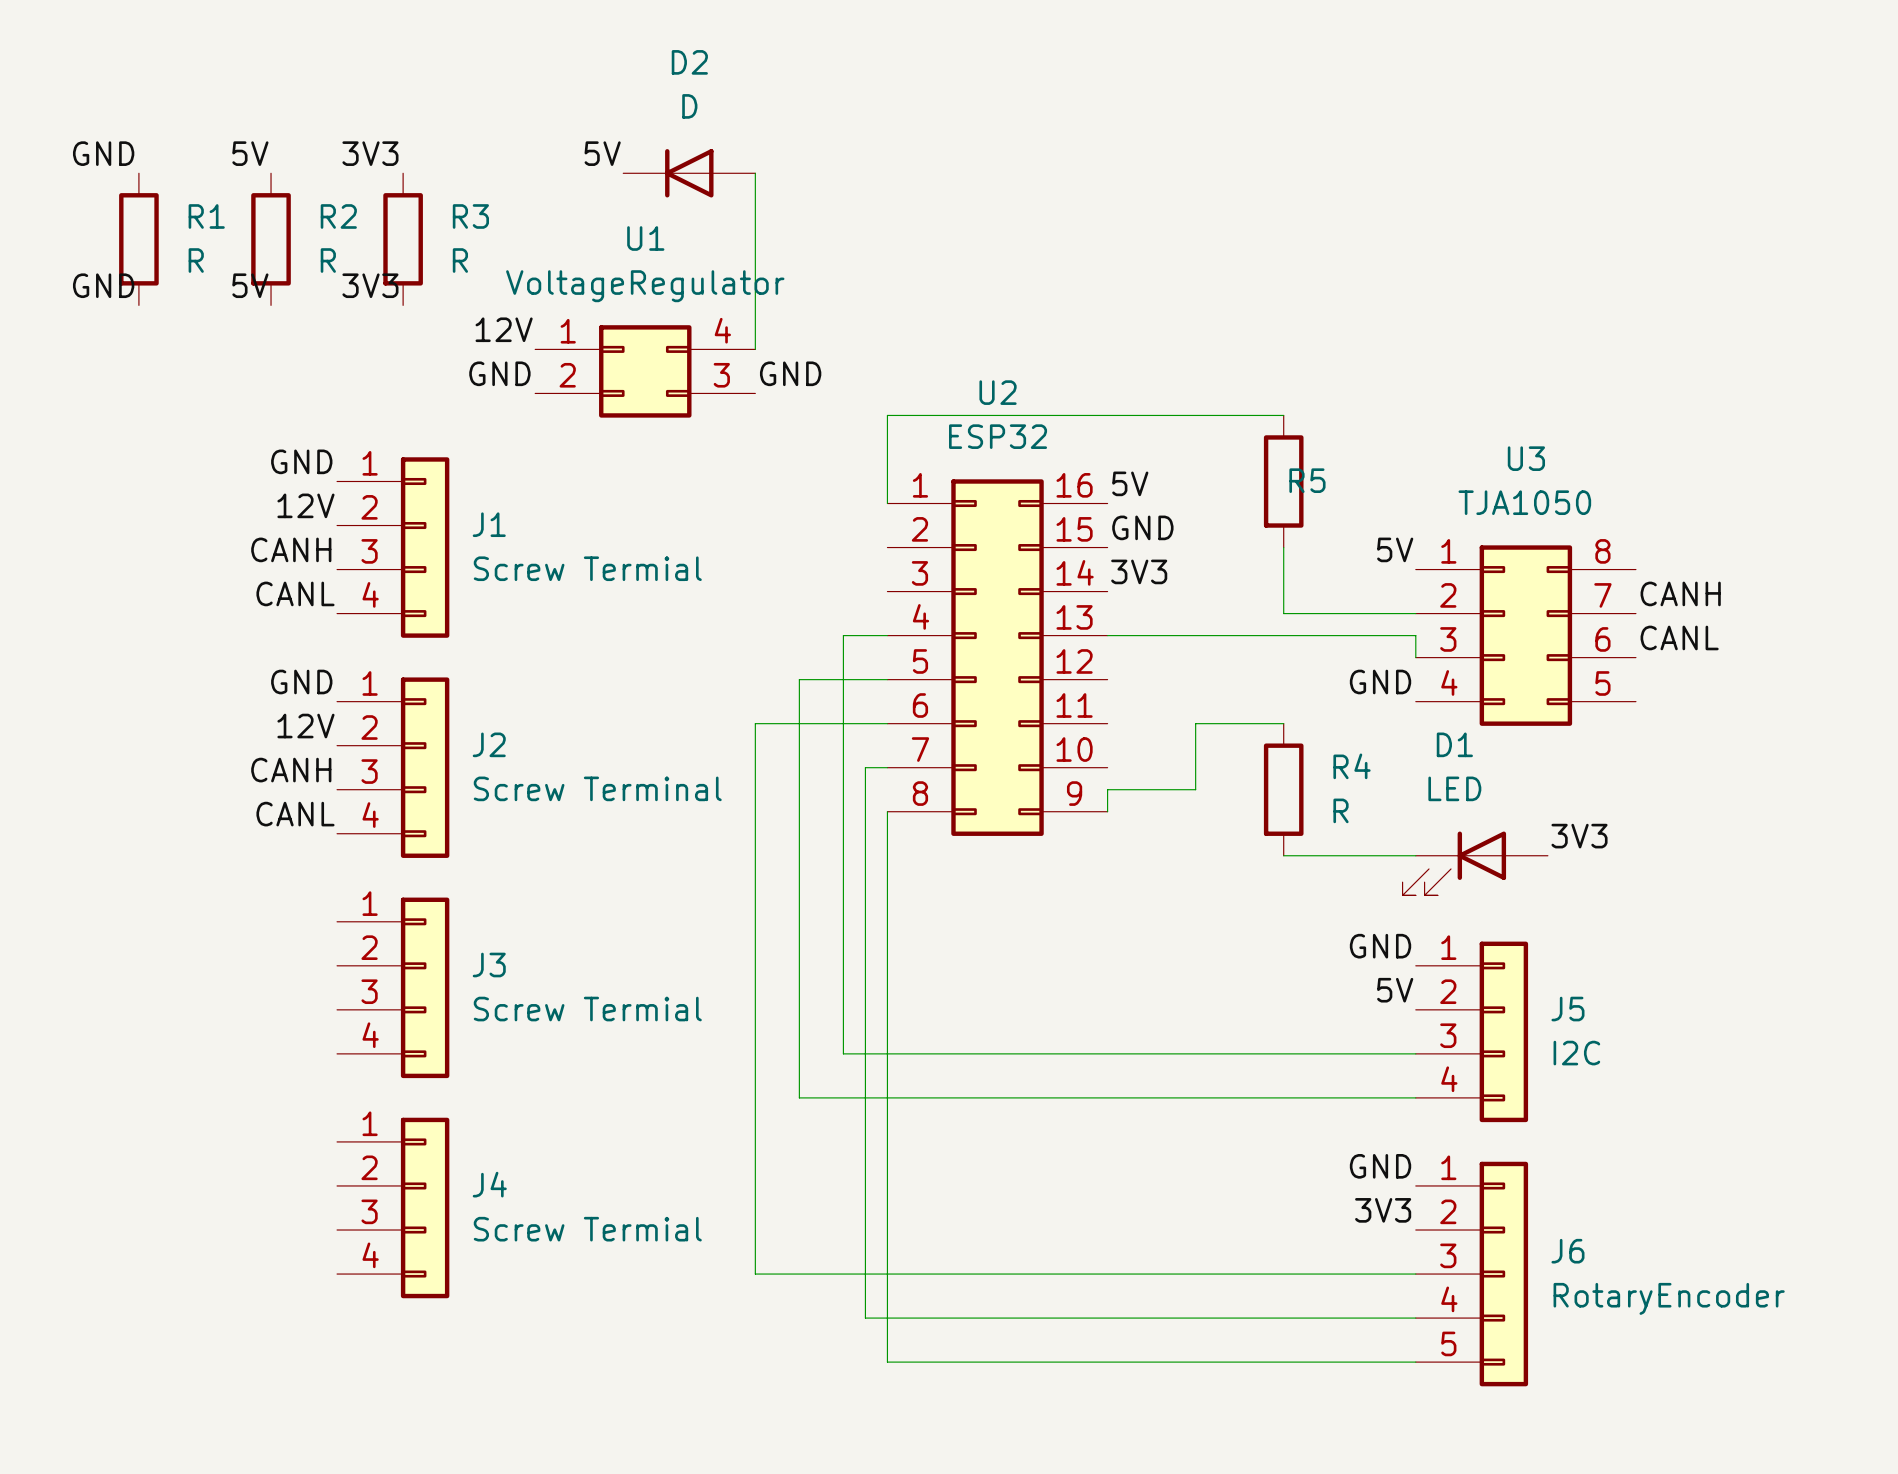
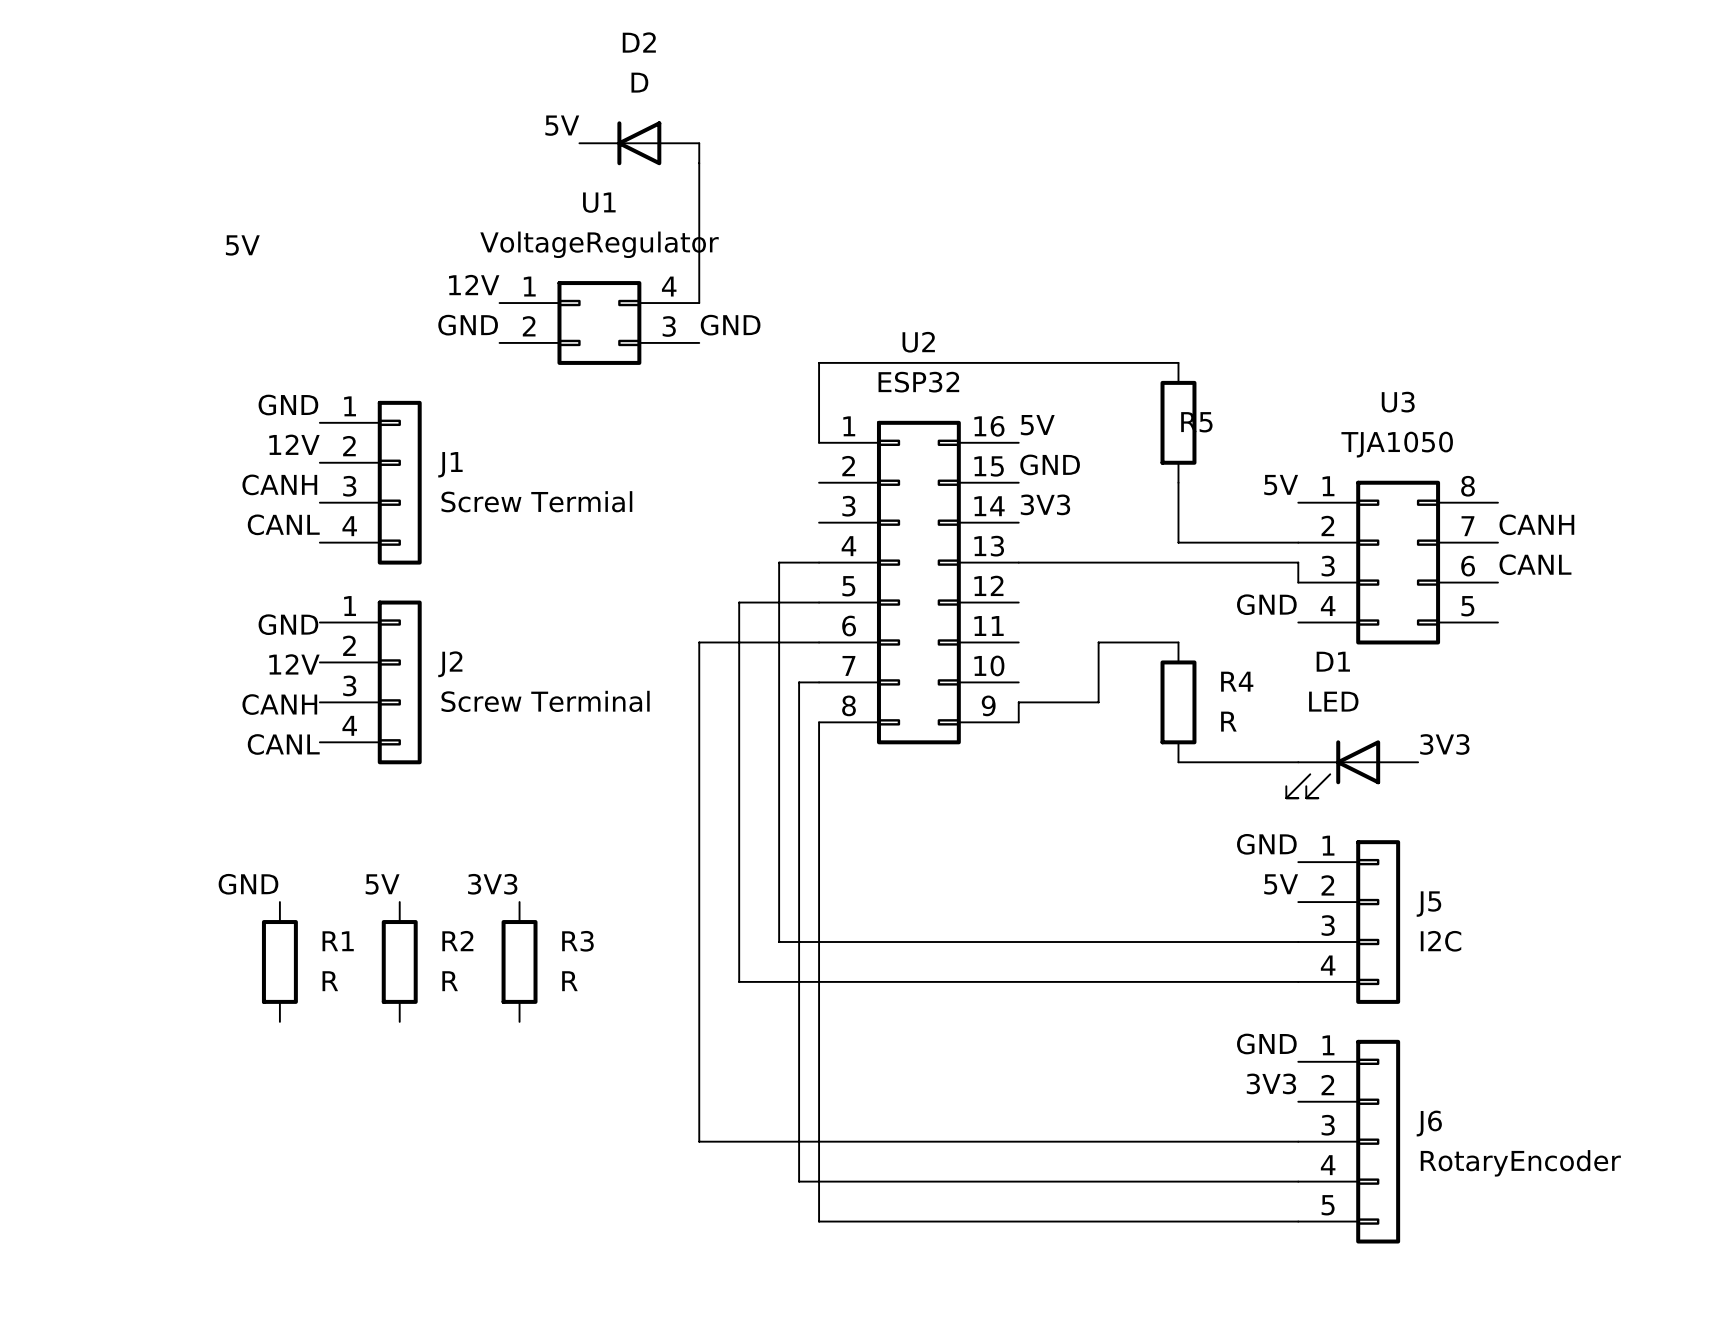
label: GND (103, 153) -> none
label: 5V (250, 153) -> none
label: 3V3 (370, 153) -> none
R1 position: (138, 239) -> (279, 961)
R2 position: (271, 239) -> (399, 961)
R3 position: (403, 239) -> (519, 961)
label: GND (103, 285) -> none
label: 3V3 (370, 285) -> none
label position: GND (301, 682) -> GND (288, 624)
label position: 12V (305, 726) -> 12V (294, 664)
label position: CANH (291, 770) -> CANH (279, 704)
label position: CANL (295, 814) -> CANL (283, 744)
J3: Screw Termial (393, 987) -> none
label: none -> GND (248, 884)
label: none -> 5V (382, 884)
label: none -> 3V3 (492, 884)
J4: Screw Termial (393, 1207) -> none

